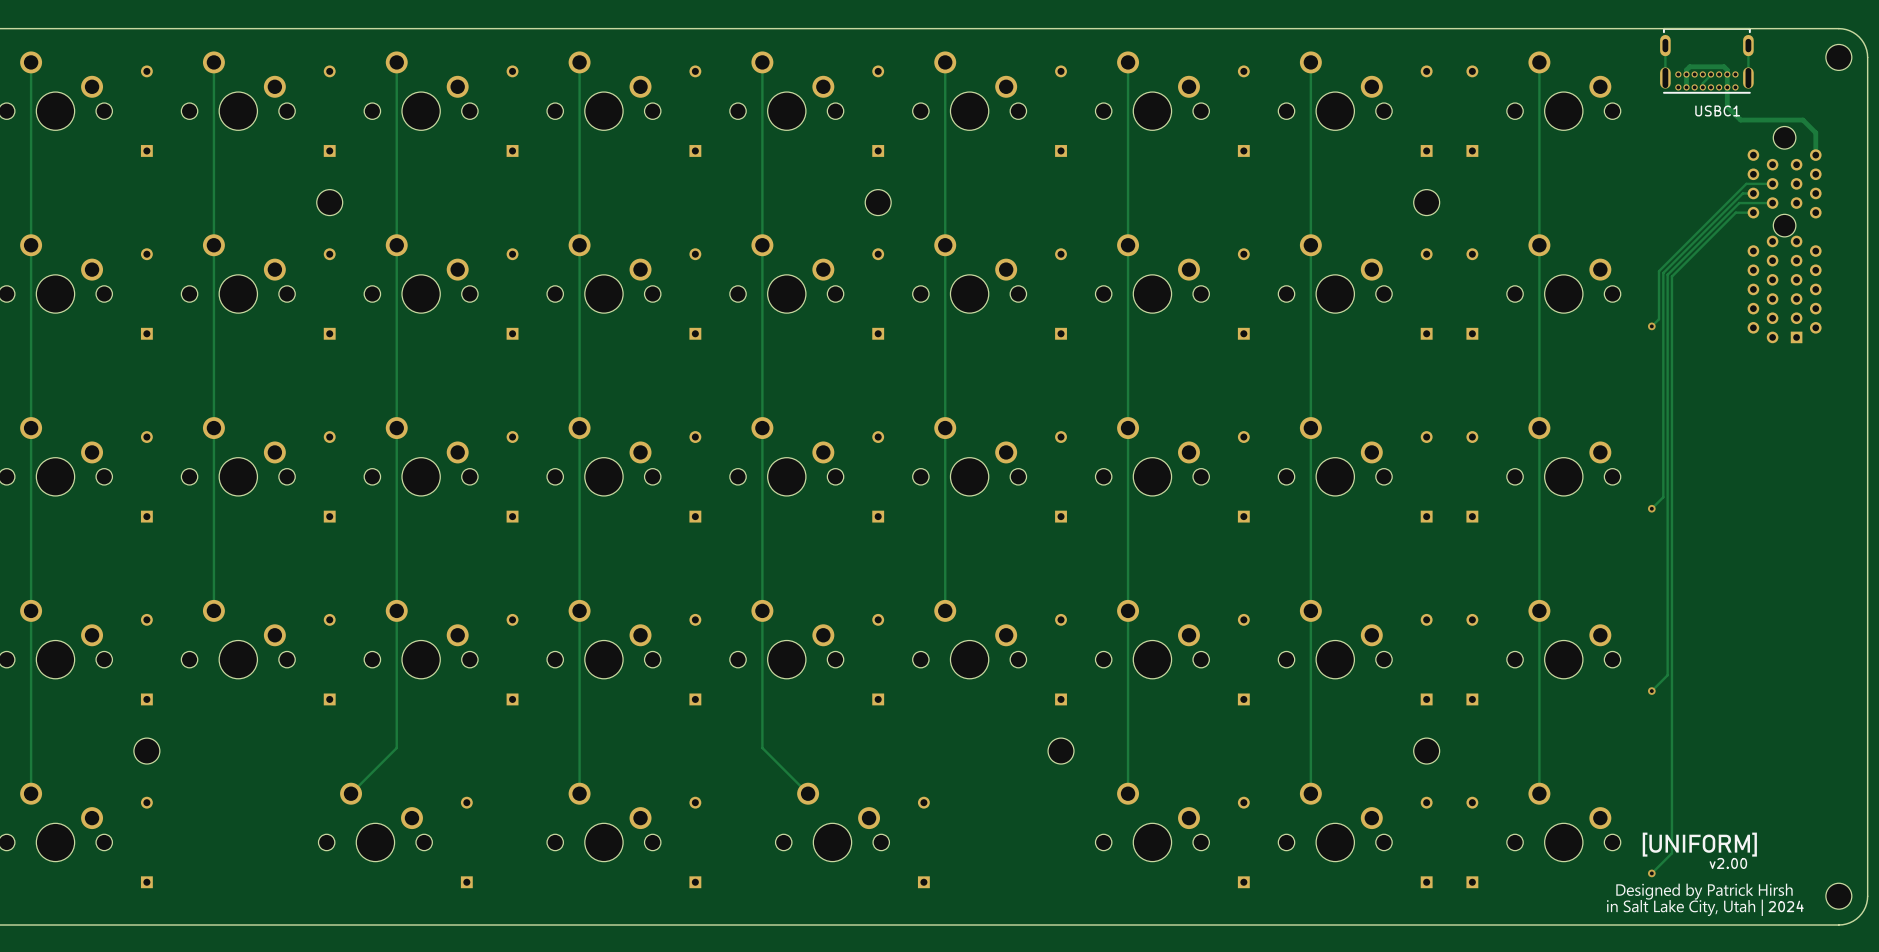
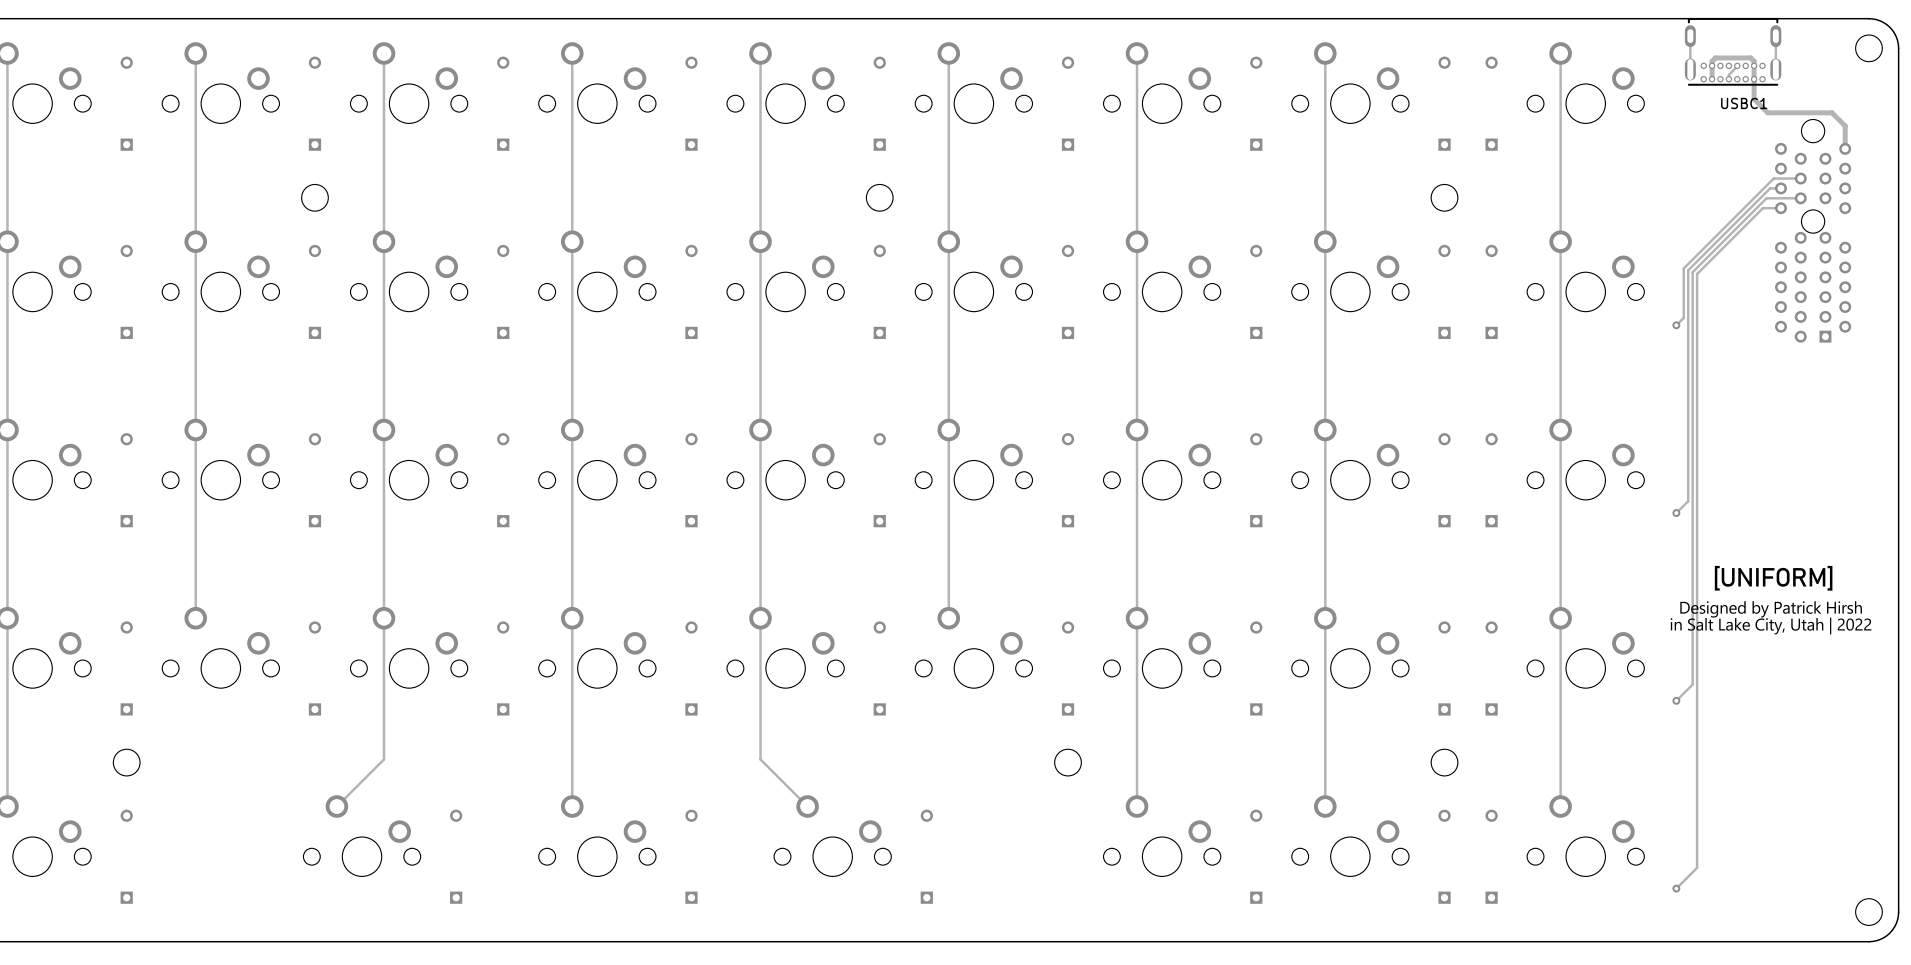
drawing: none -> [1670, 565, 1872, 635]
drawing: [1642, 832, 1757, 857] -> none
text: v2.00 (1728, 863) -> none
drawing: [1606, 883, 1793, 916] -> none
text: 2024 (1786, 906) -> none

